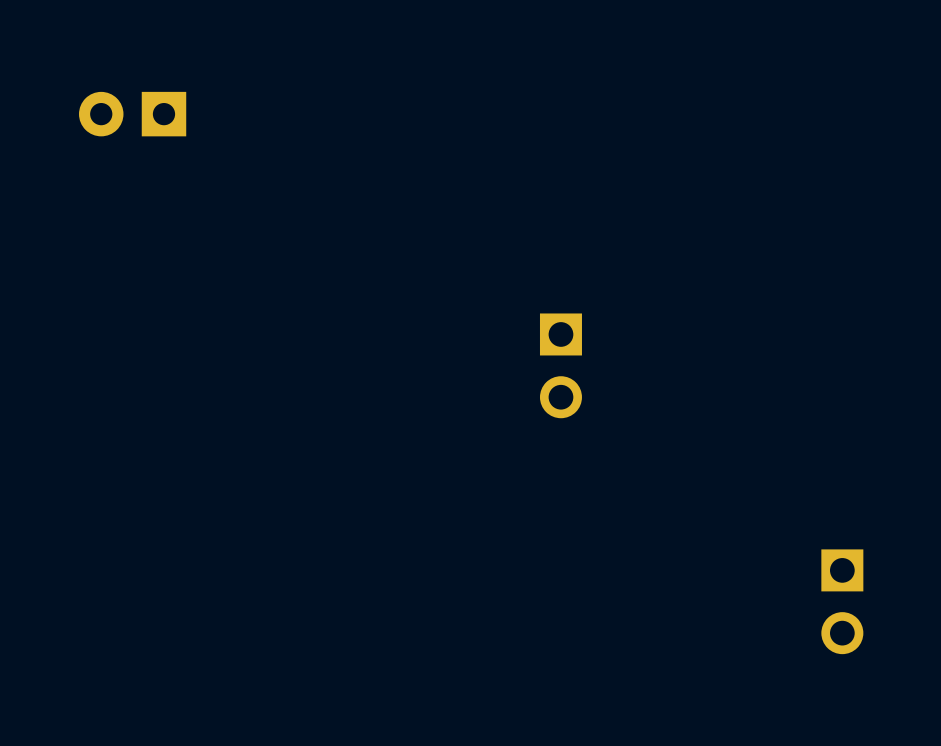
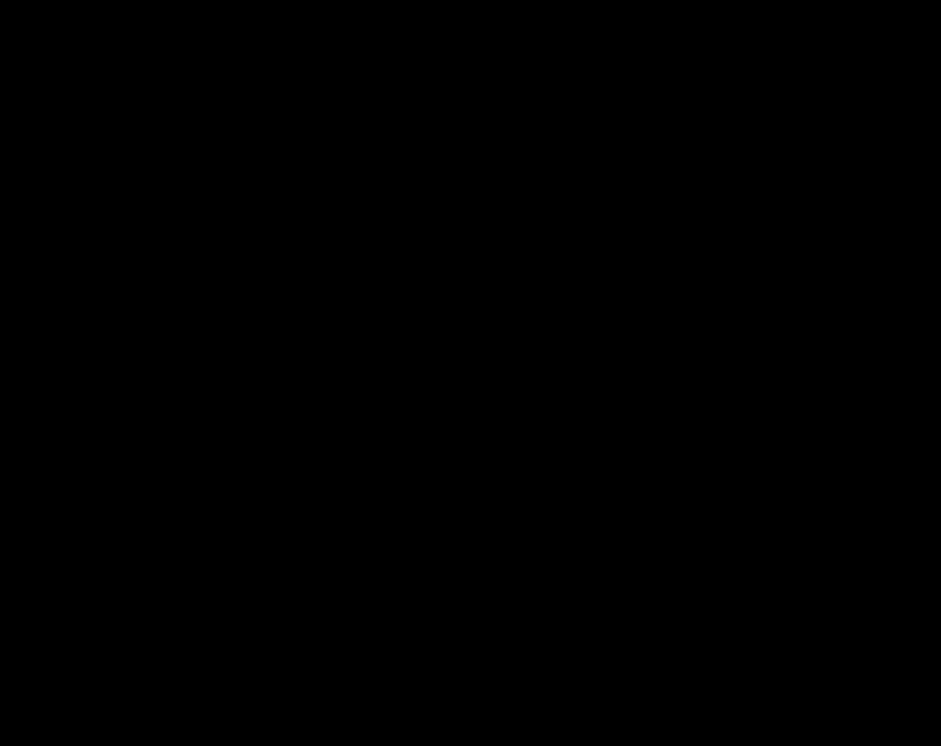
part: (132, 114) -> none
part: (560, 365) -> none
part: (842, 601) -> none

